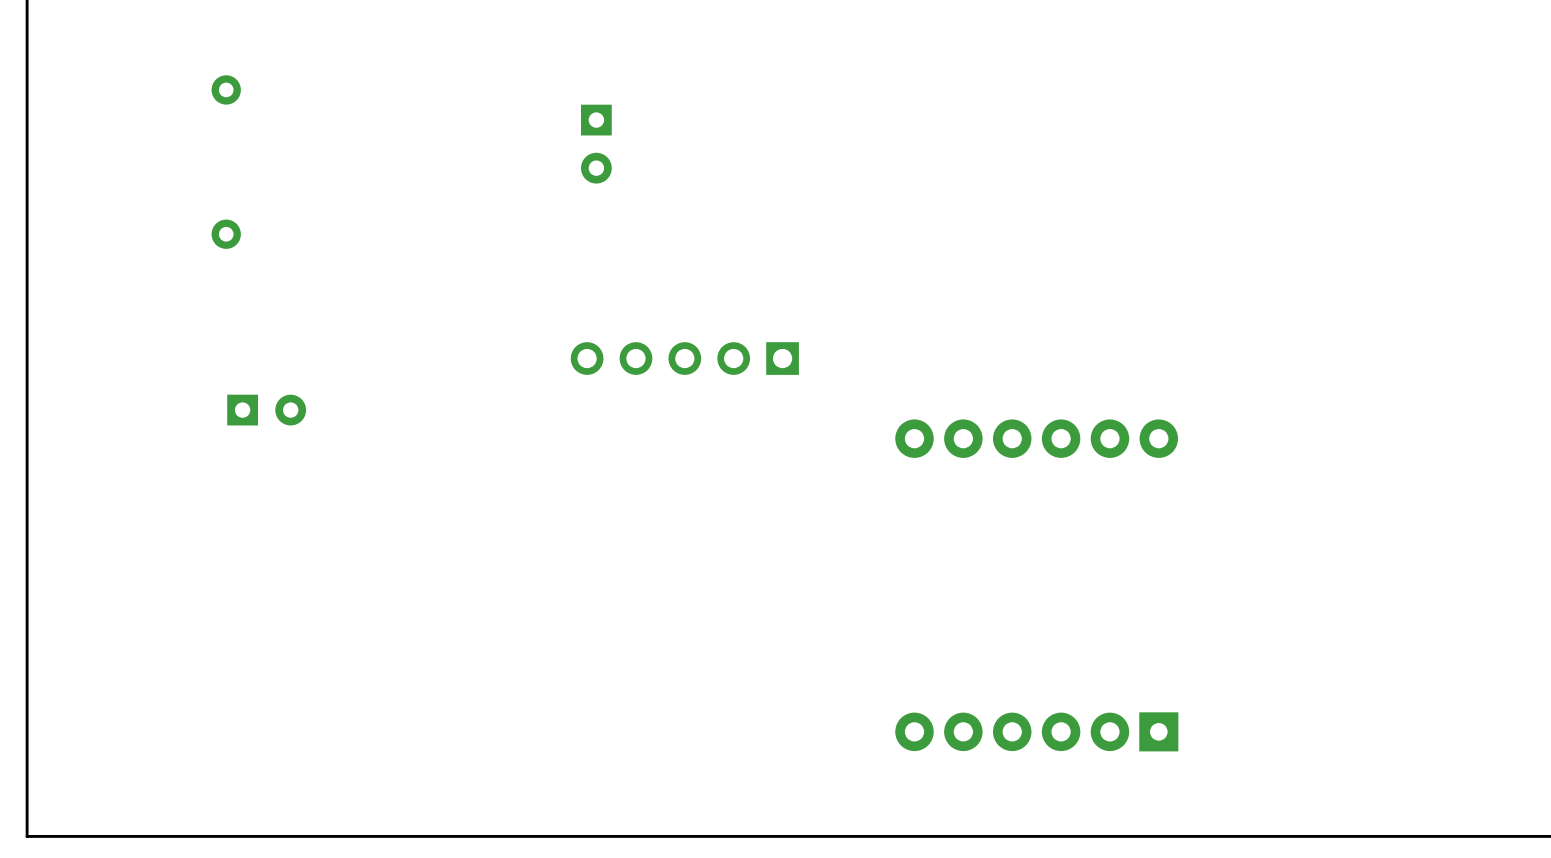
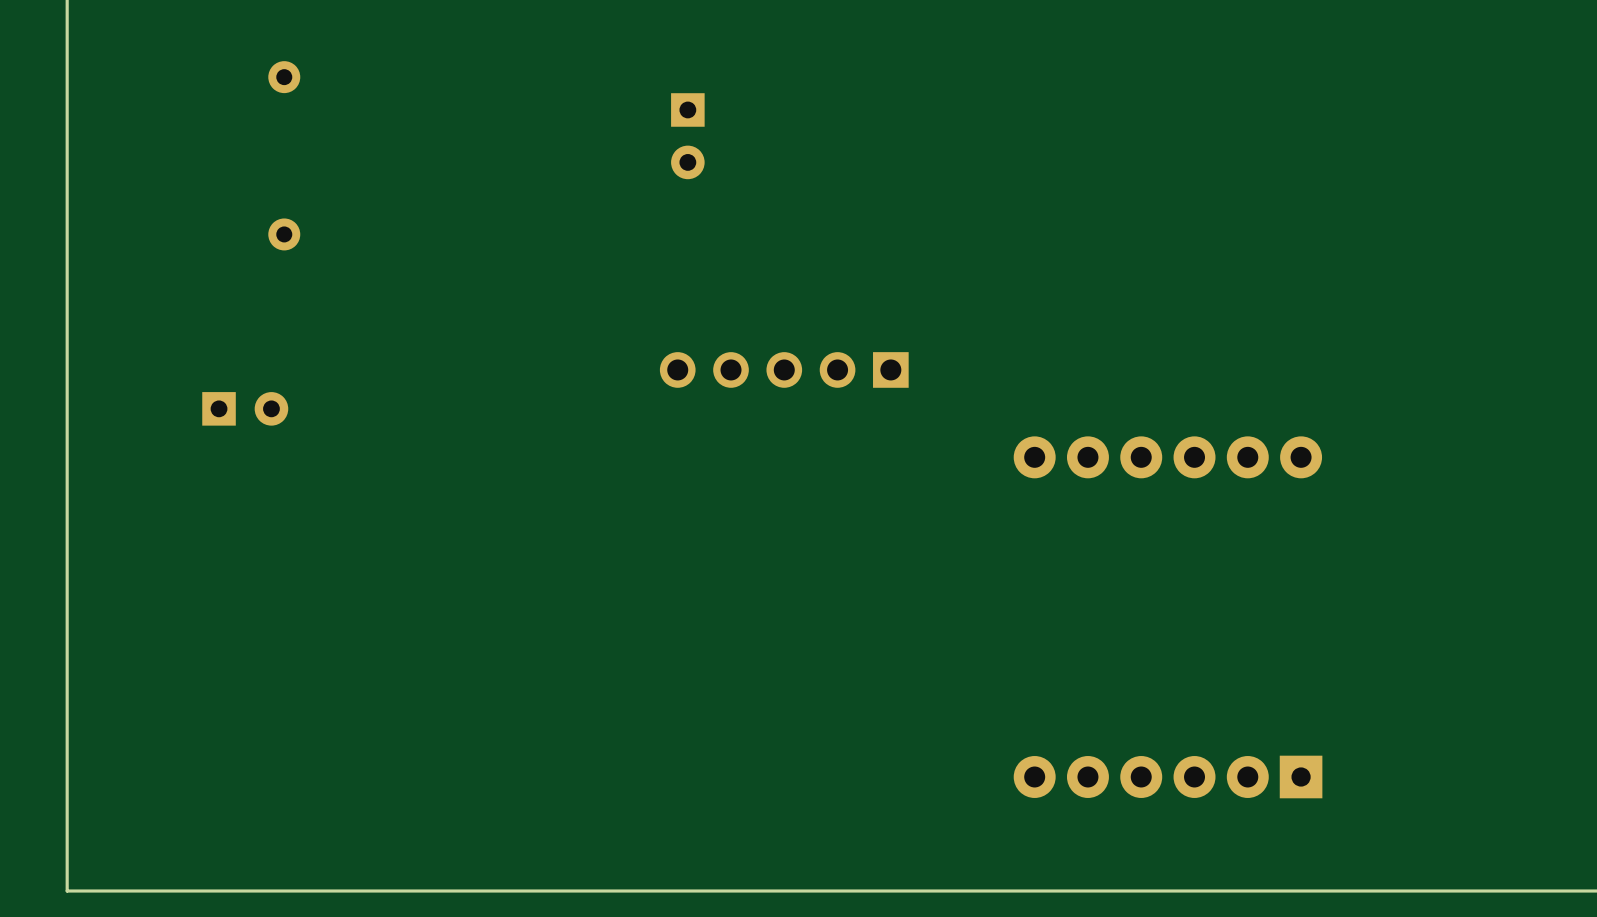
part position: (266, 410) -> (245, 408)

